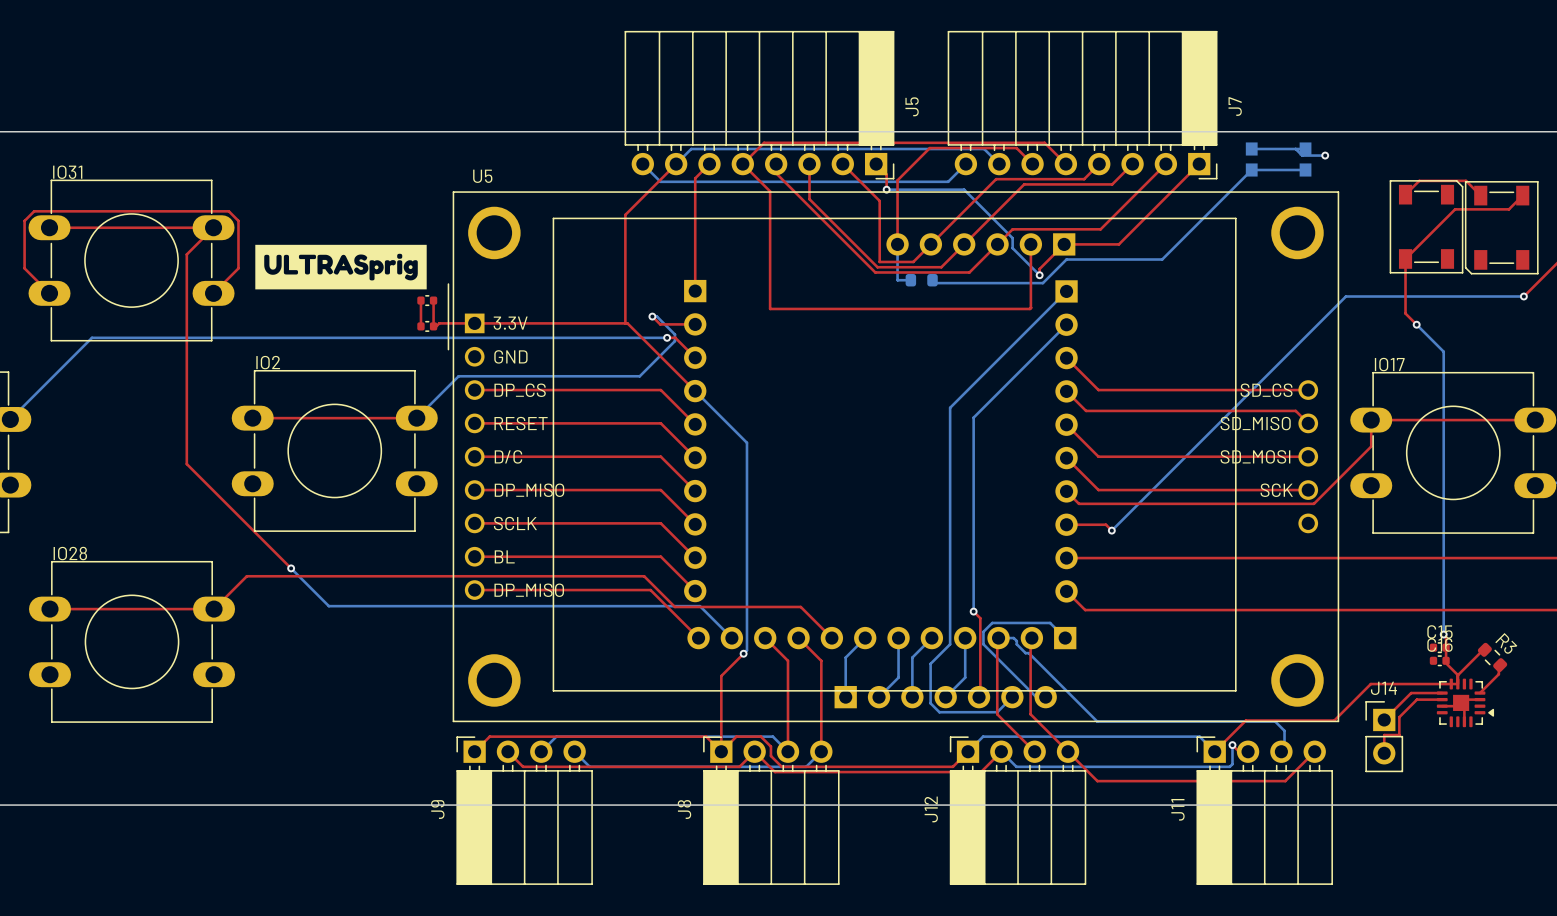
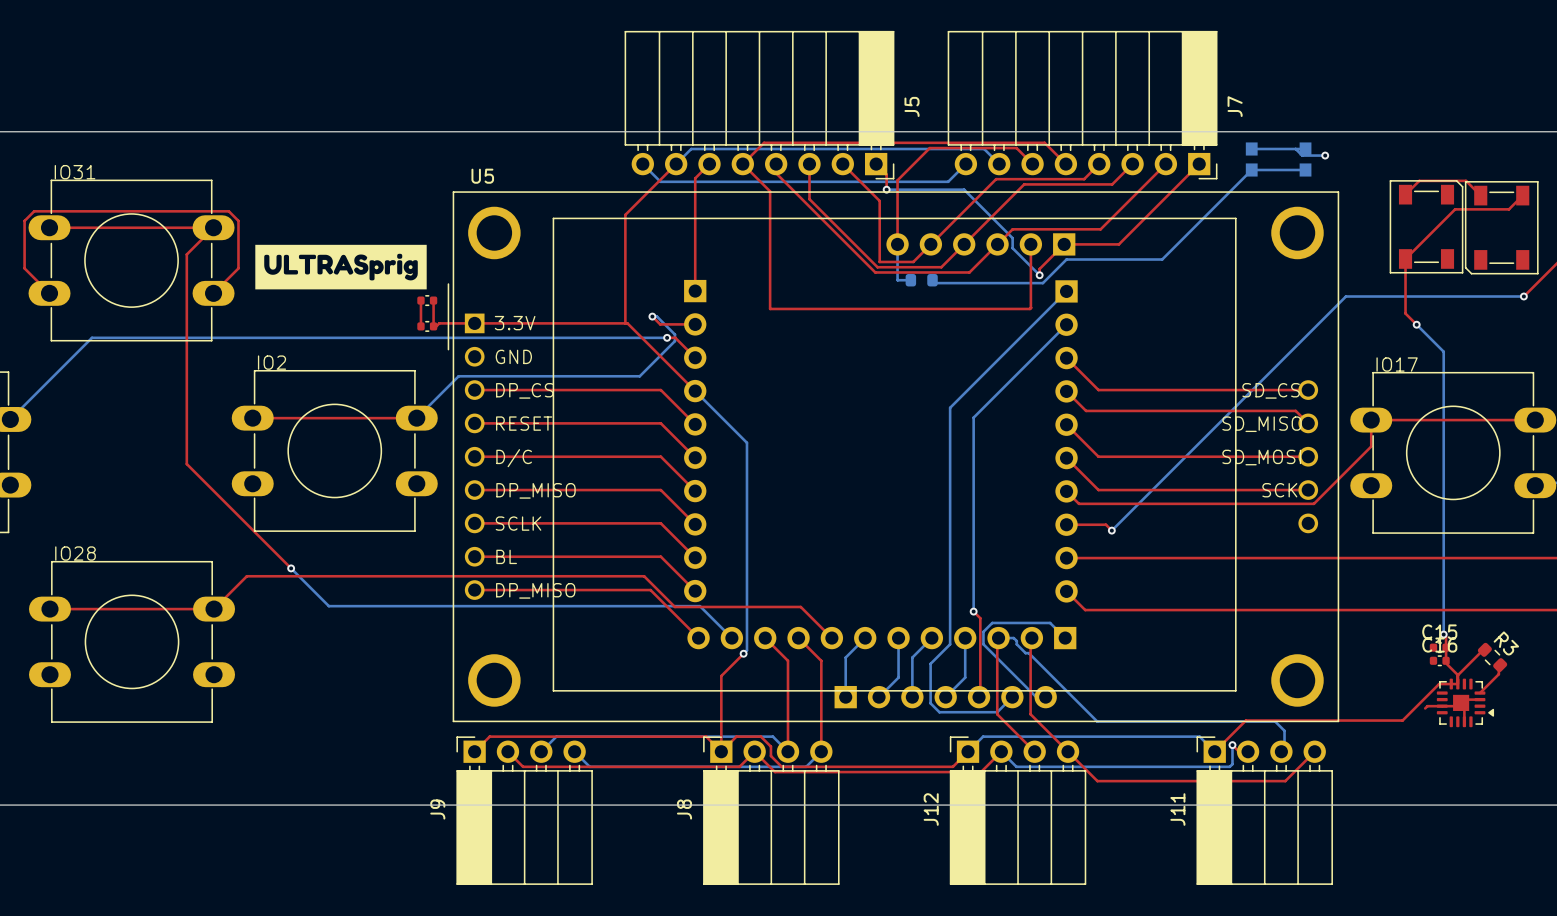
top track: (1439, 684) (1370, 684) (1334, 720) -> (1439, 684) (1402, 720) (1334, 720)
top track: (1442, 693) (1411, 693) (1384, 719) -> none
top track: (1442, 699) (1416, 699) (1399, 717) (1399, 735) (1384, 735) (1384, 753) -> none
top track: none -> (1442, 706) (1427, 706) (1425, 708)
J14: (1384, 736) -> none

